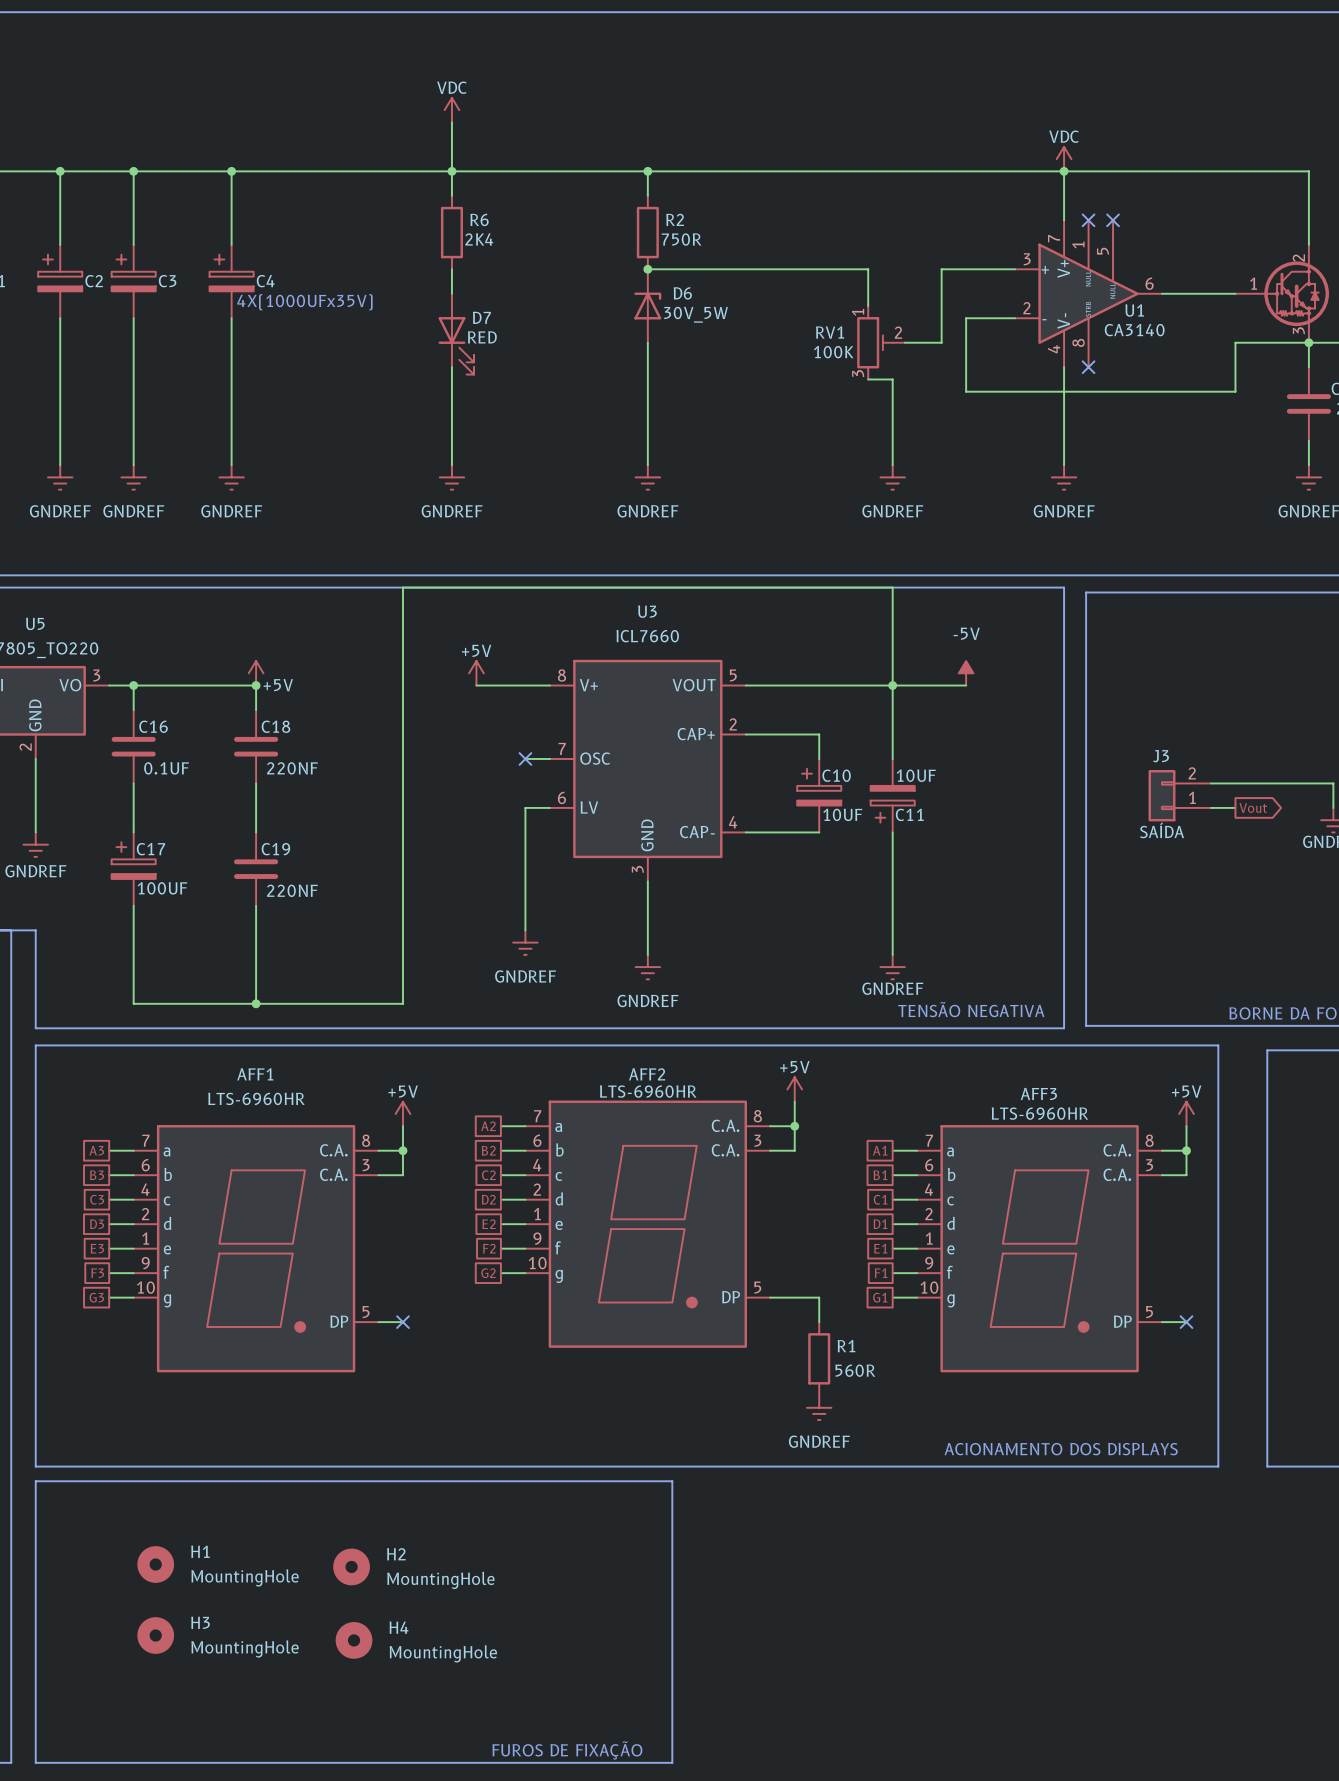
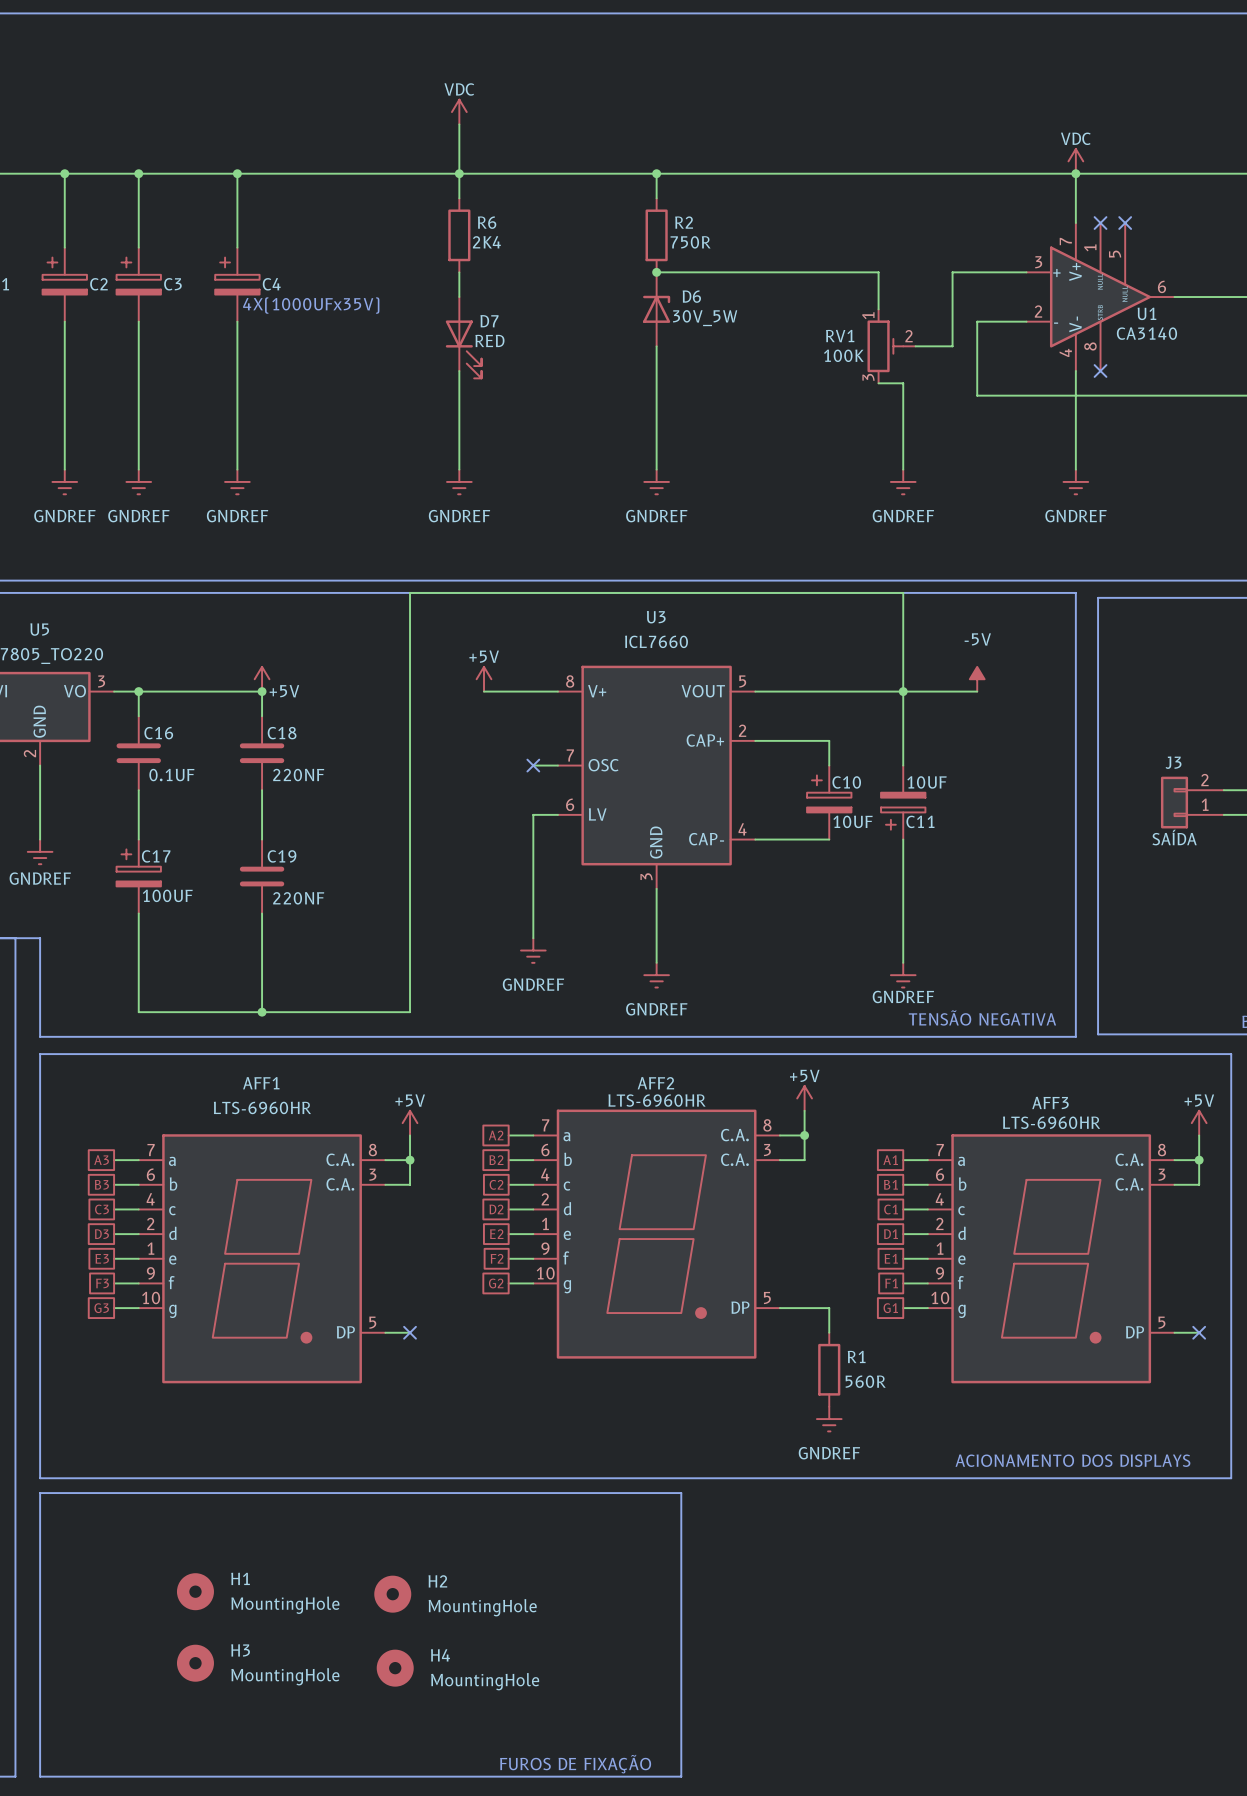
H1 position: (155, 1564) -> (195, 1591)
H2 position: (351, 1566) -> (392, 1594)
H3 position: (155, 1635) -> (195, 1663)
H4 position: (354, 1640) -> (395, 1668)

